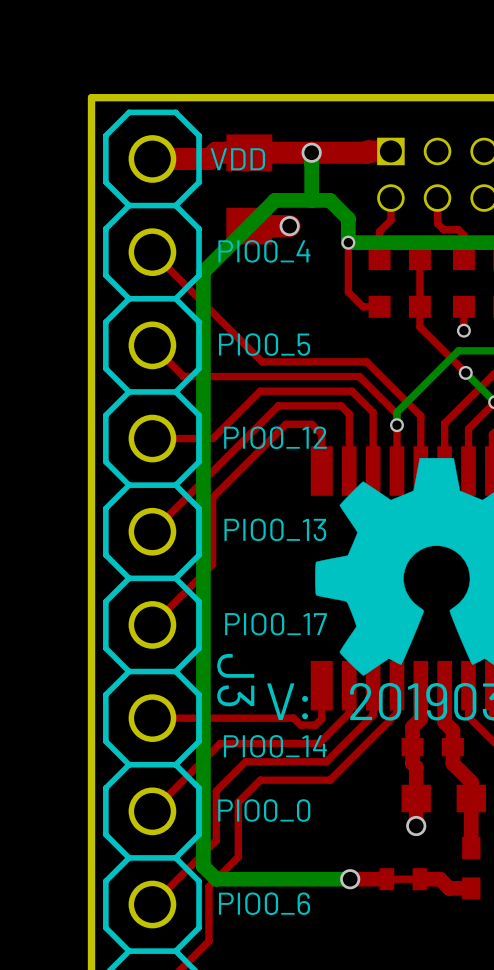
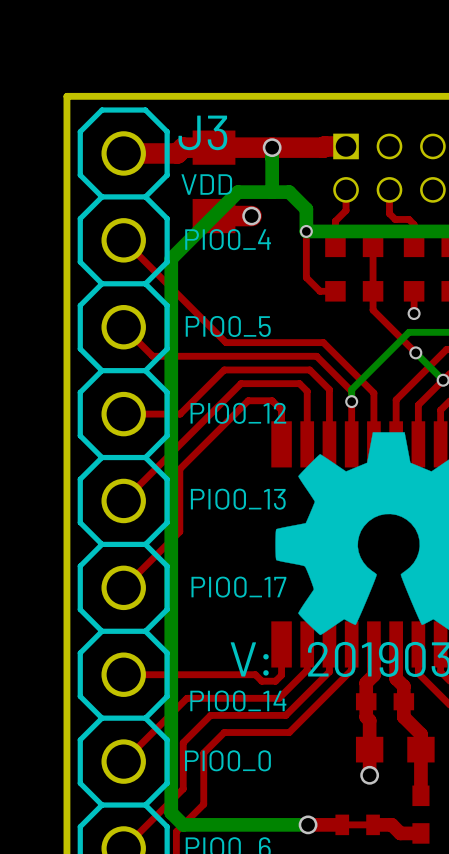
J3 text position: VDD (237, 159) -> VDD (206, 184)
J3 name rotation: 0° (235, 680) -> 90° counterclockwise (202, 132)
J3 name position: J3 (235, 680) -> J3 (202, 132)

